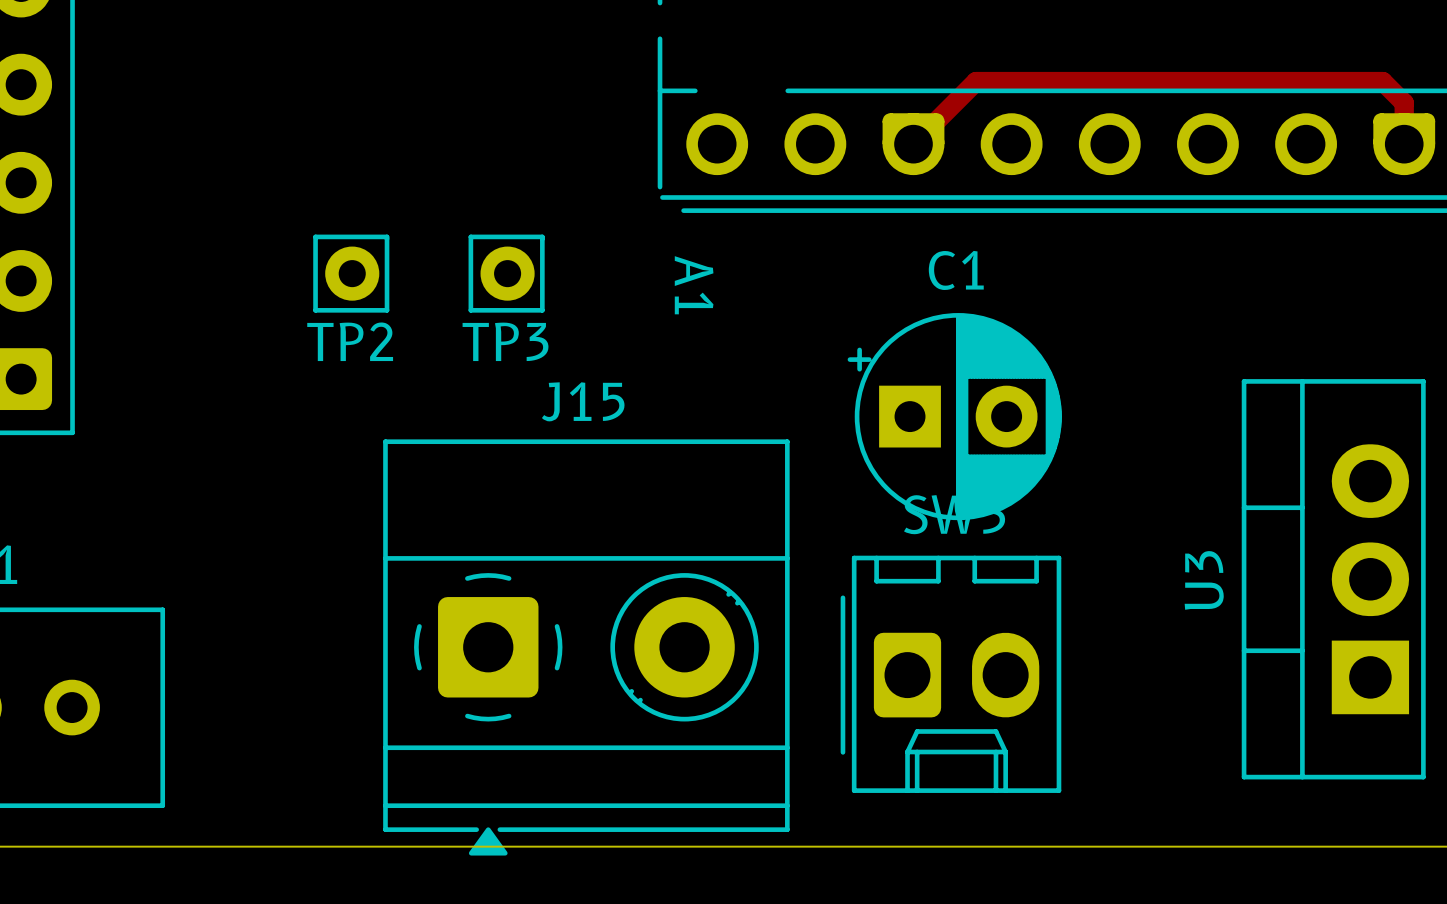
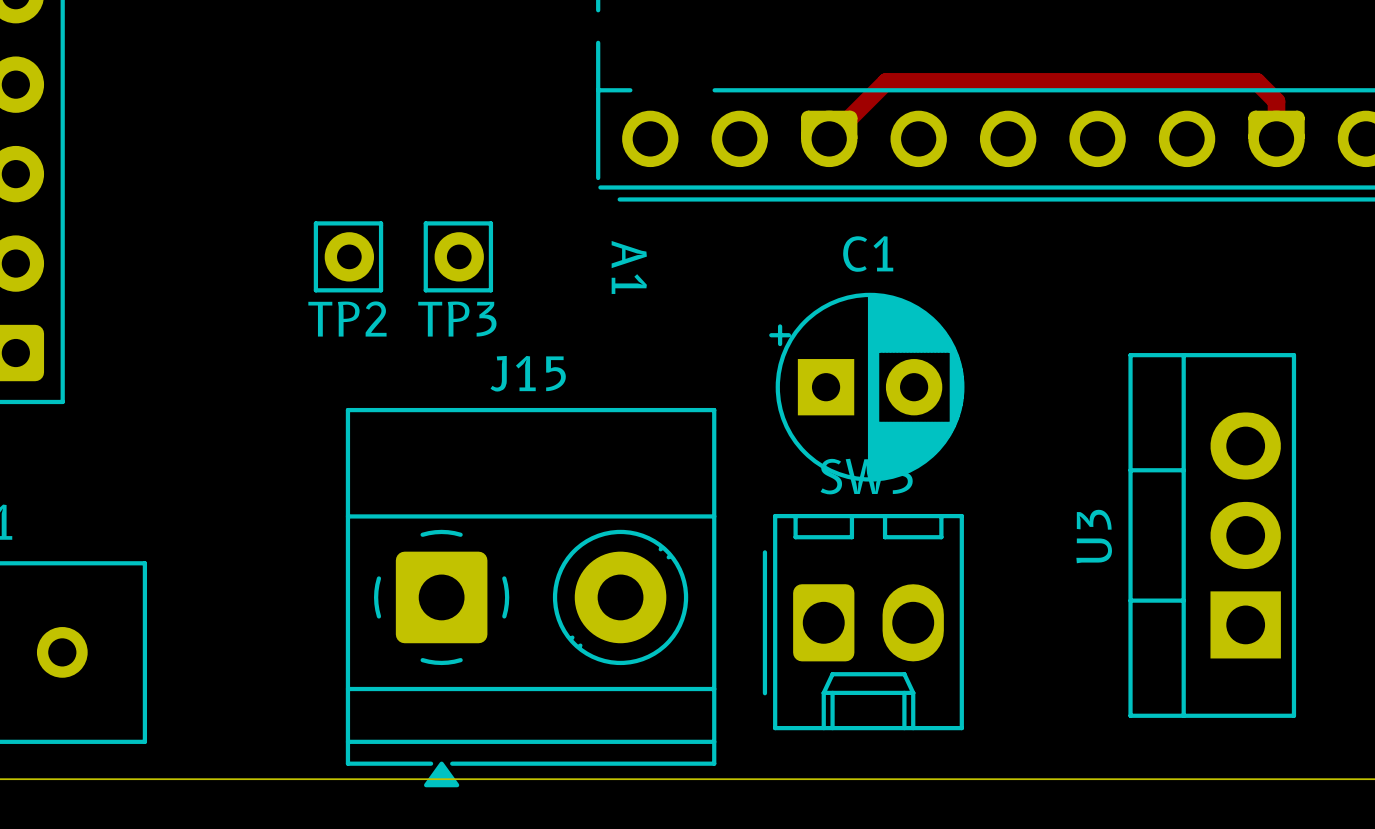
TP2 position: (351, 273) -> (348, 256)

